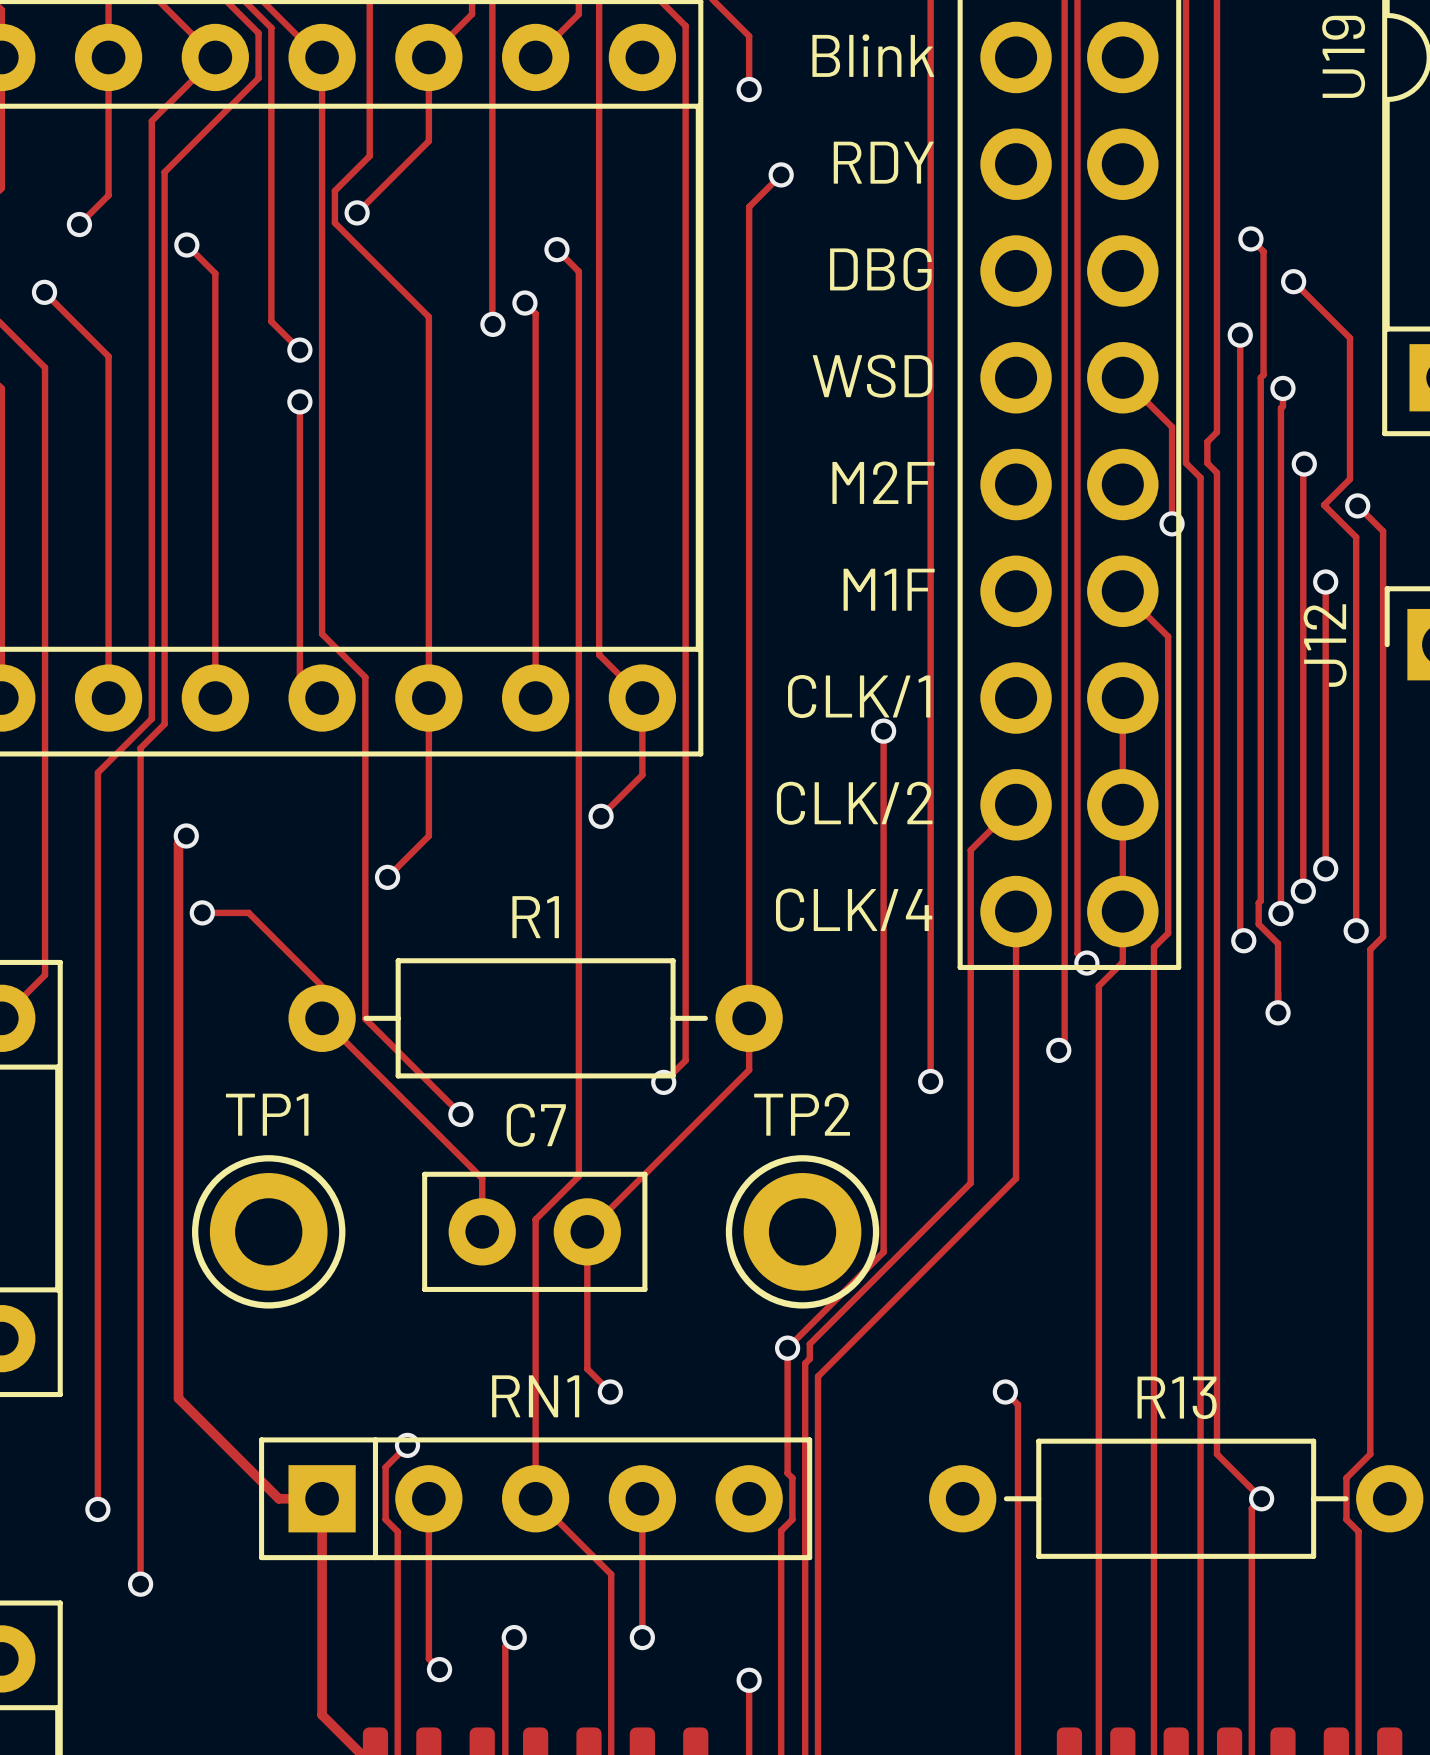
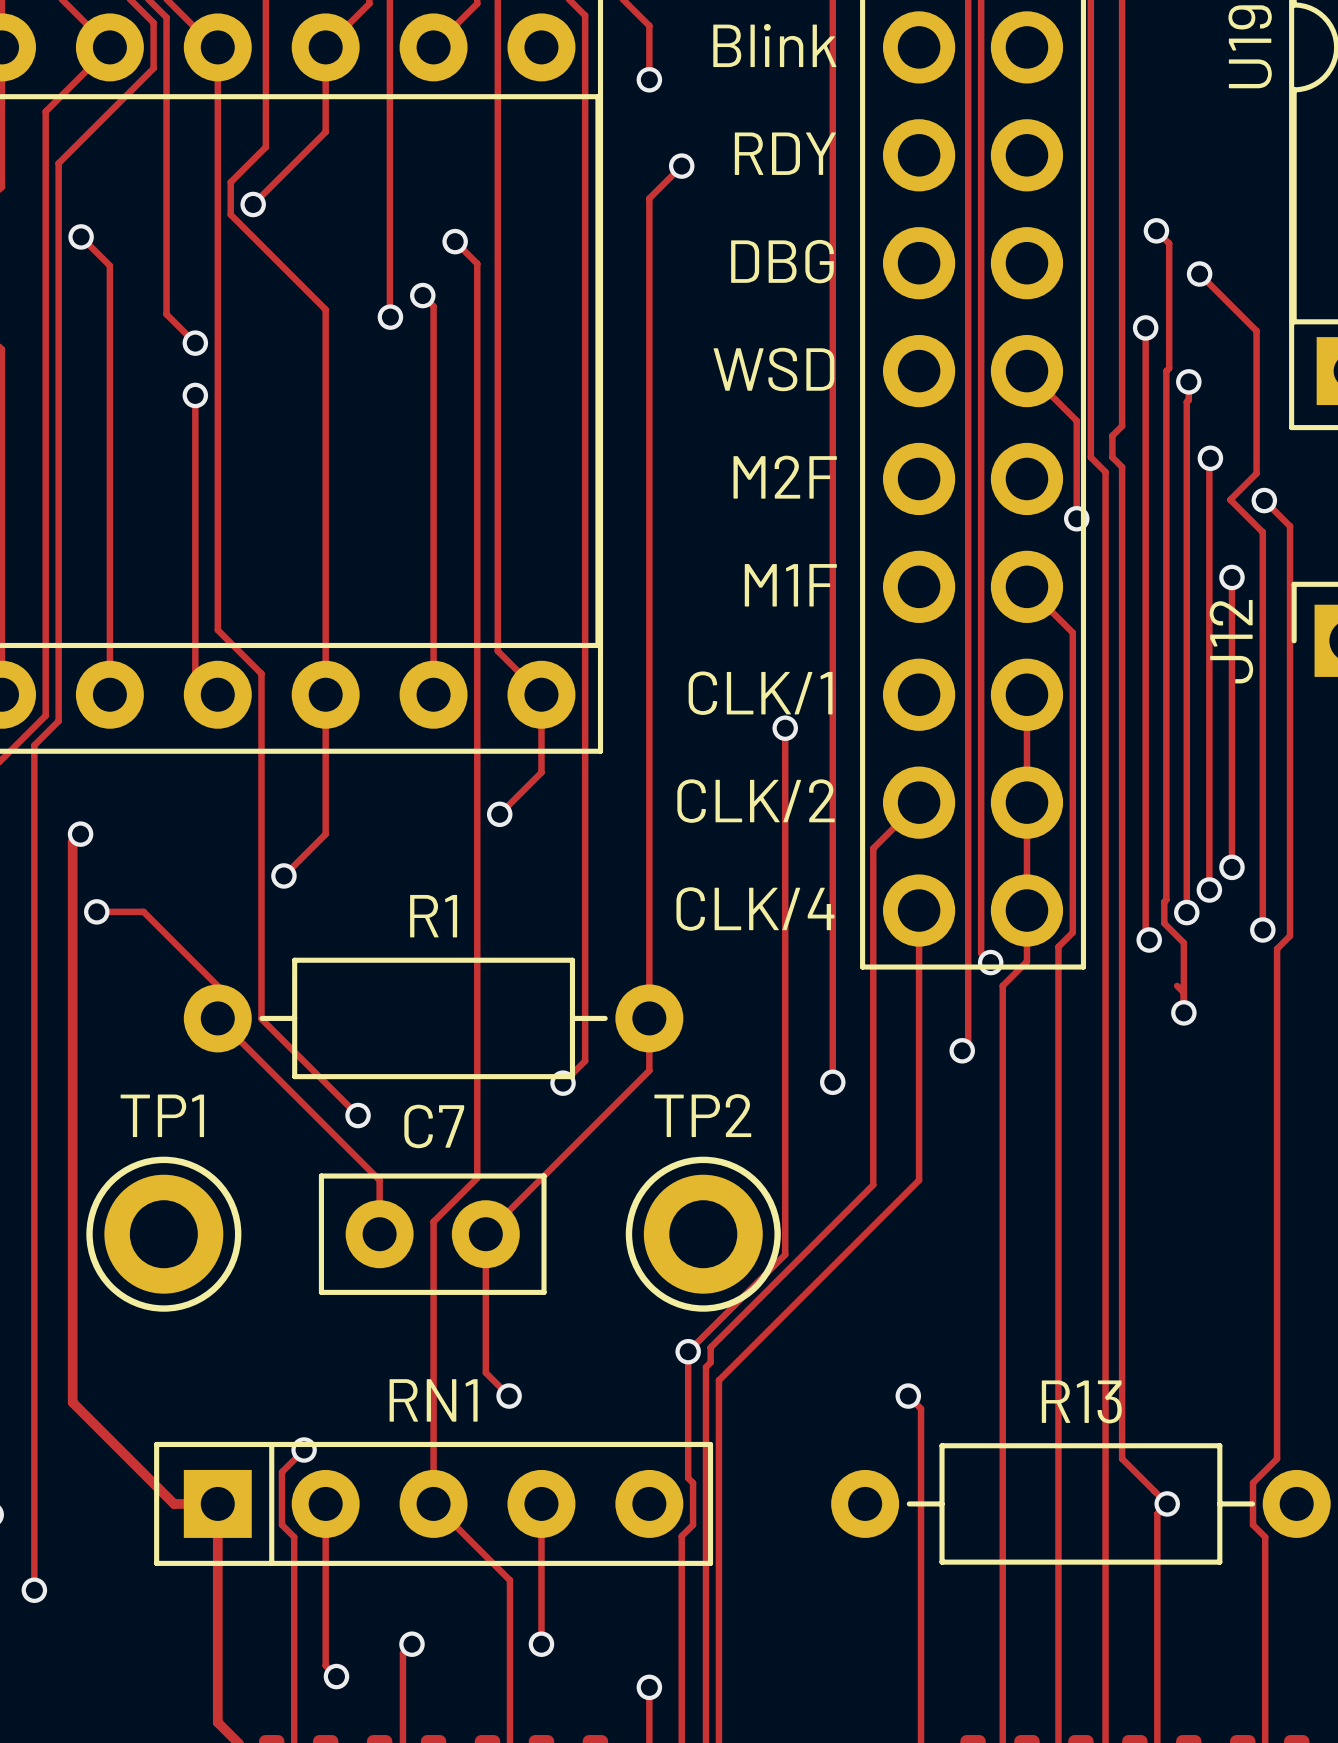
track: none -> (1177, 985) (1183, 992)

